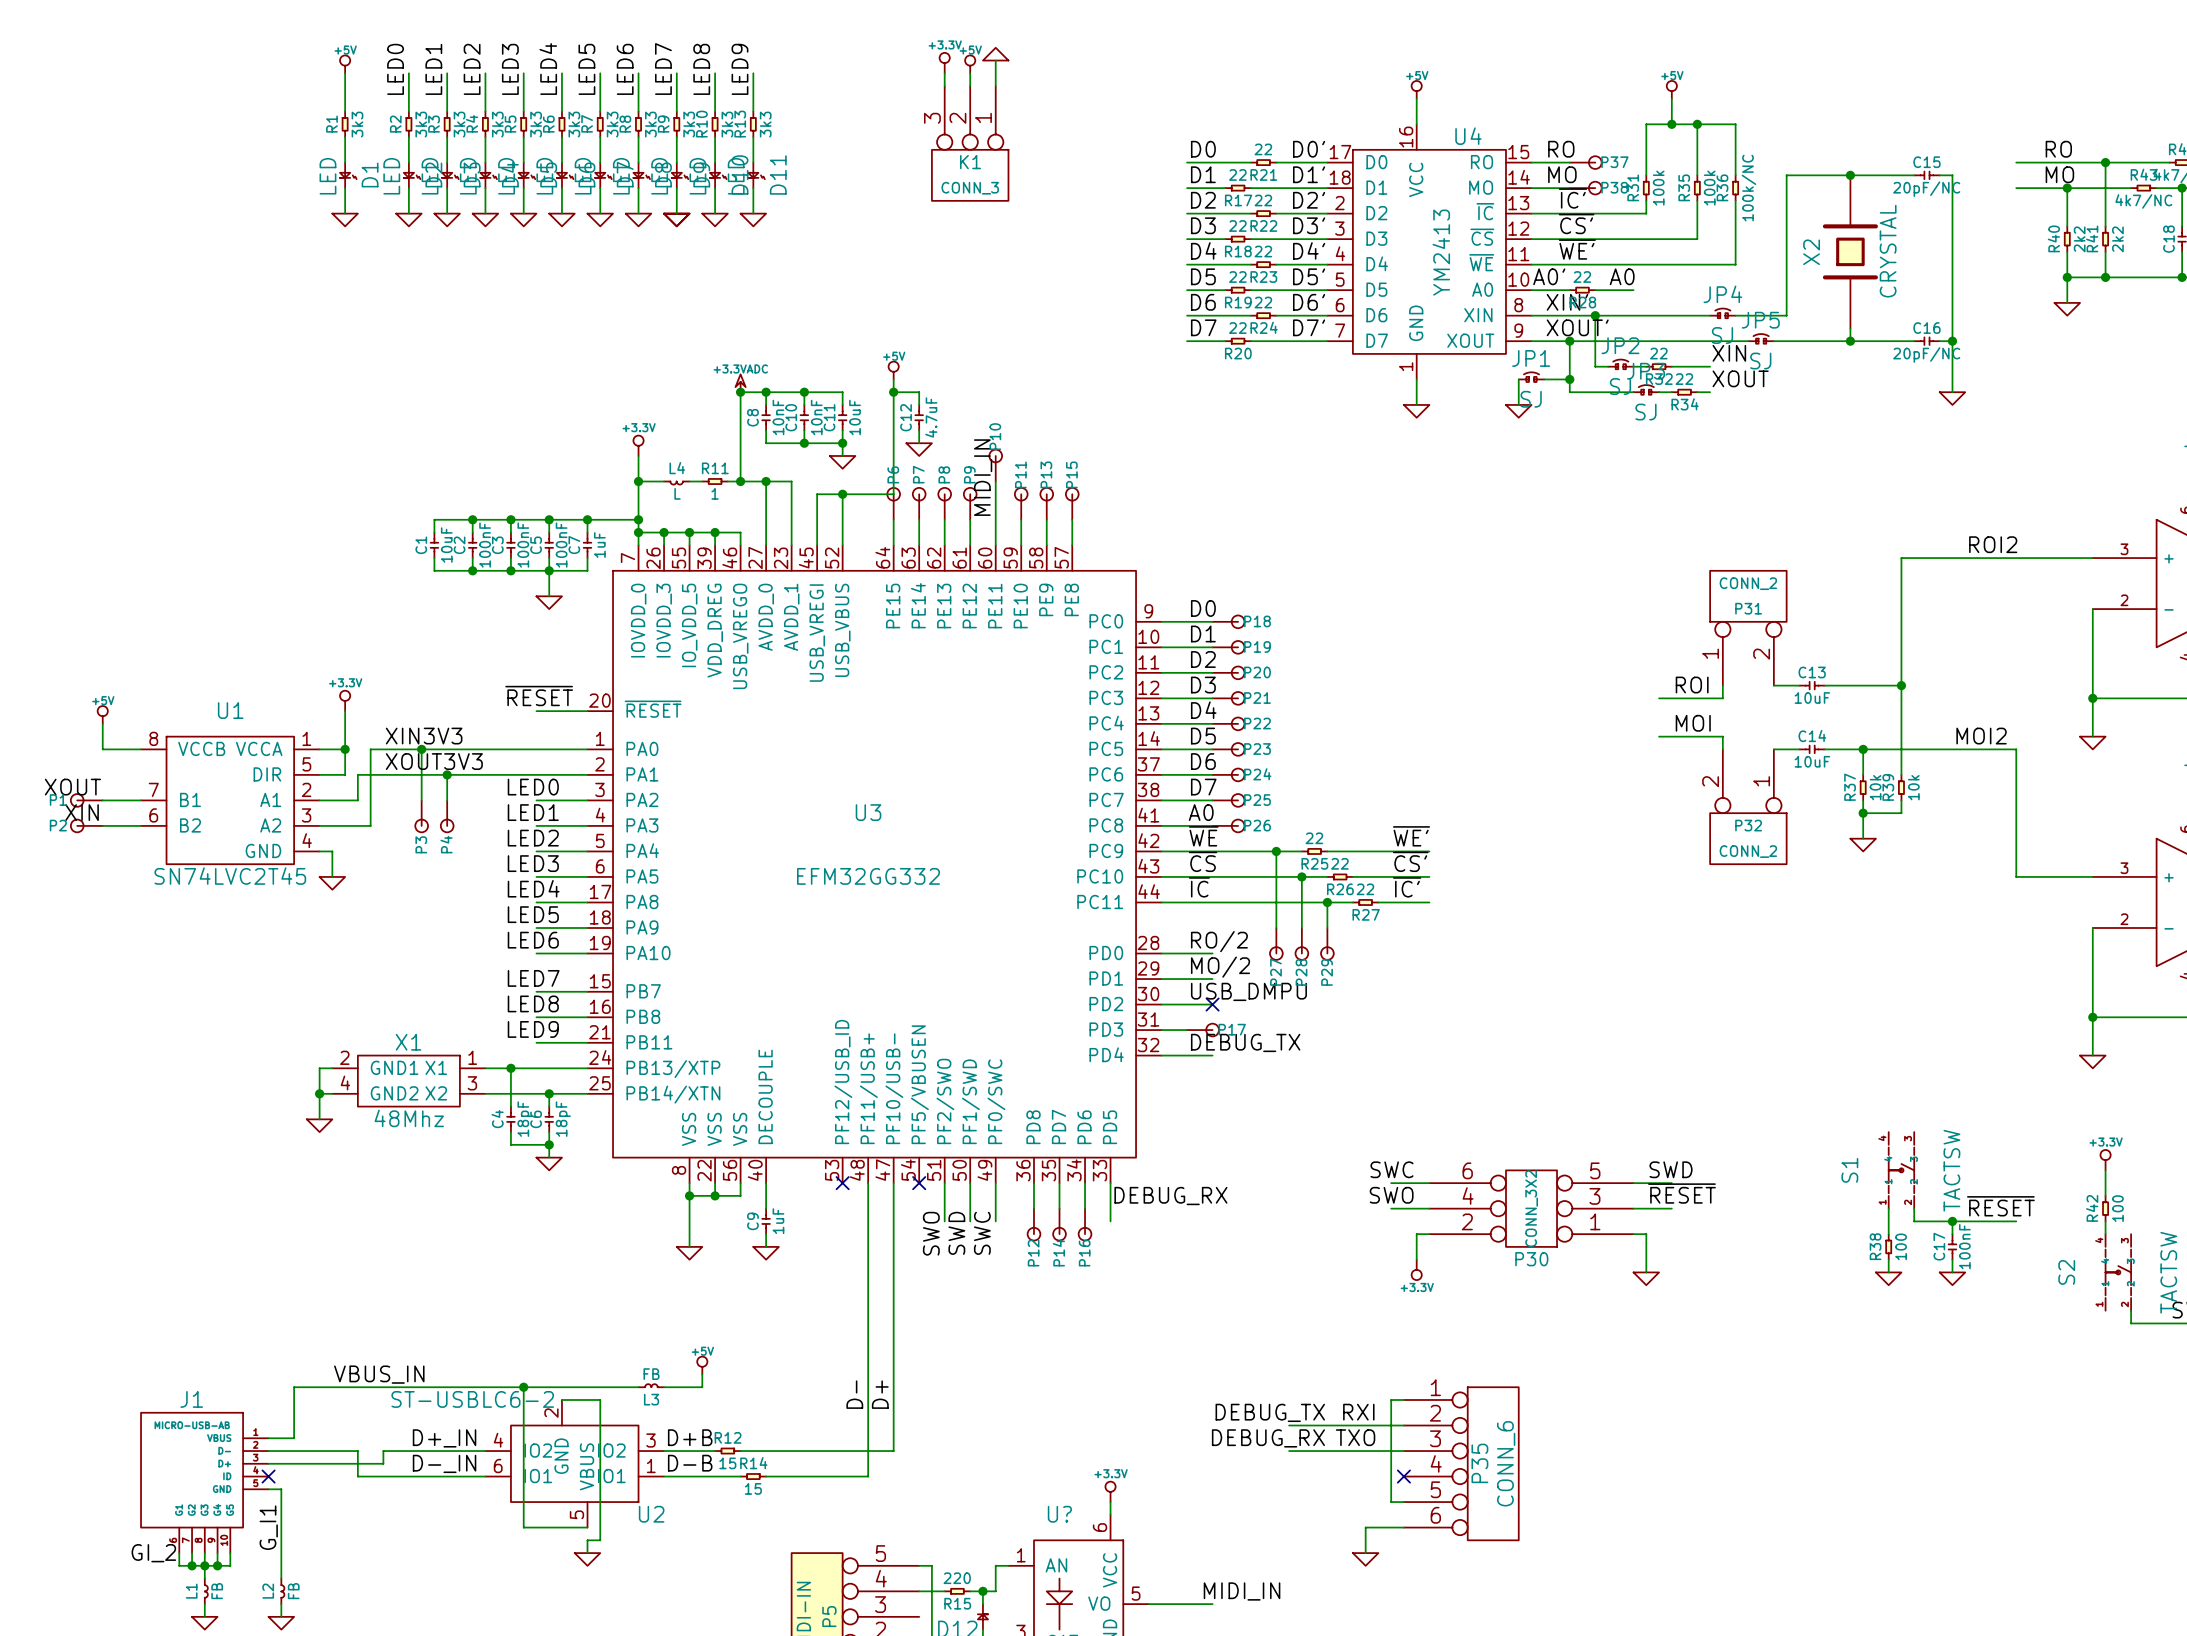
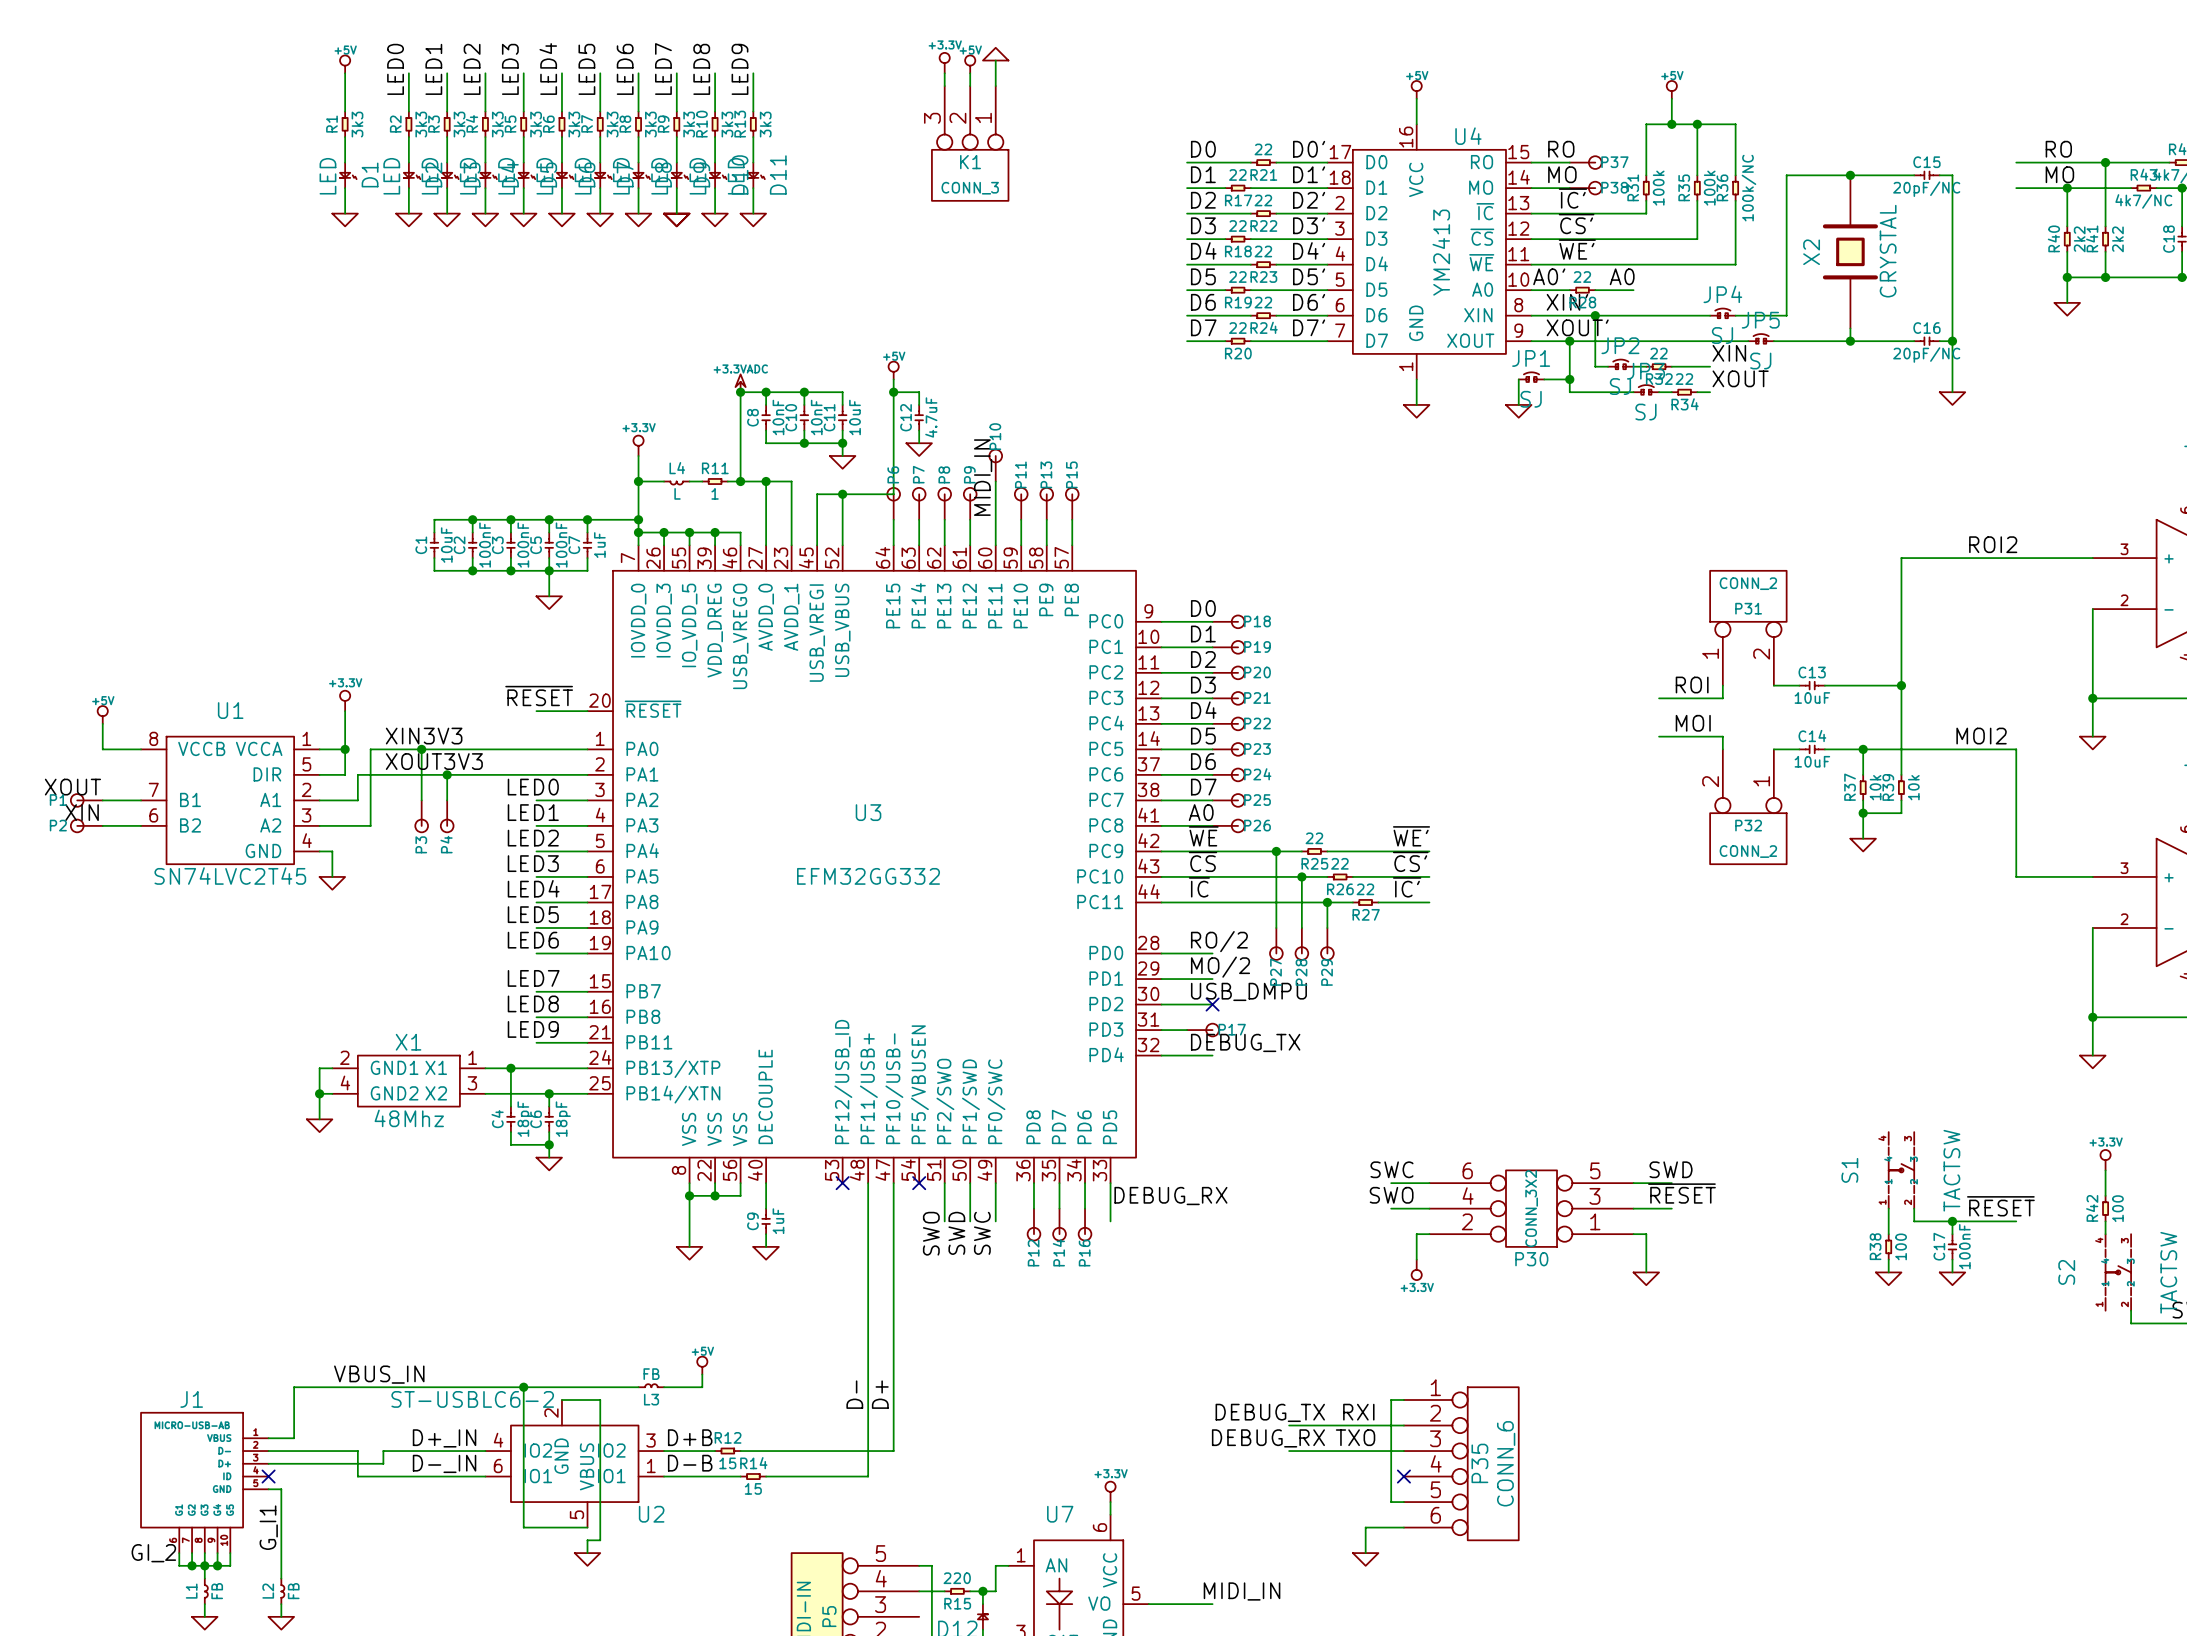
U? name: U? (1059, 1514) -> U7 (1060, 1514)

